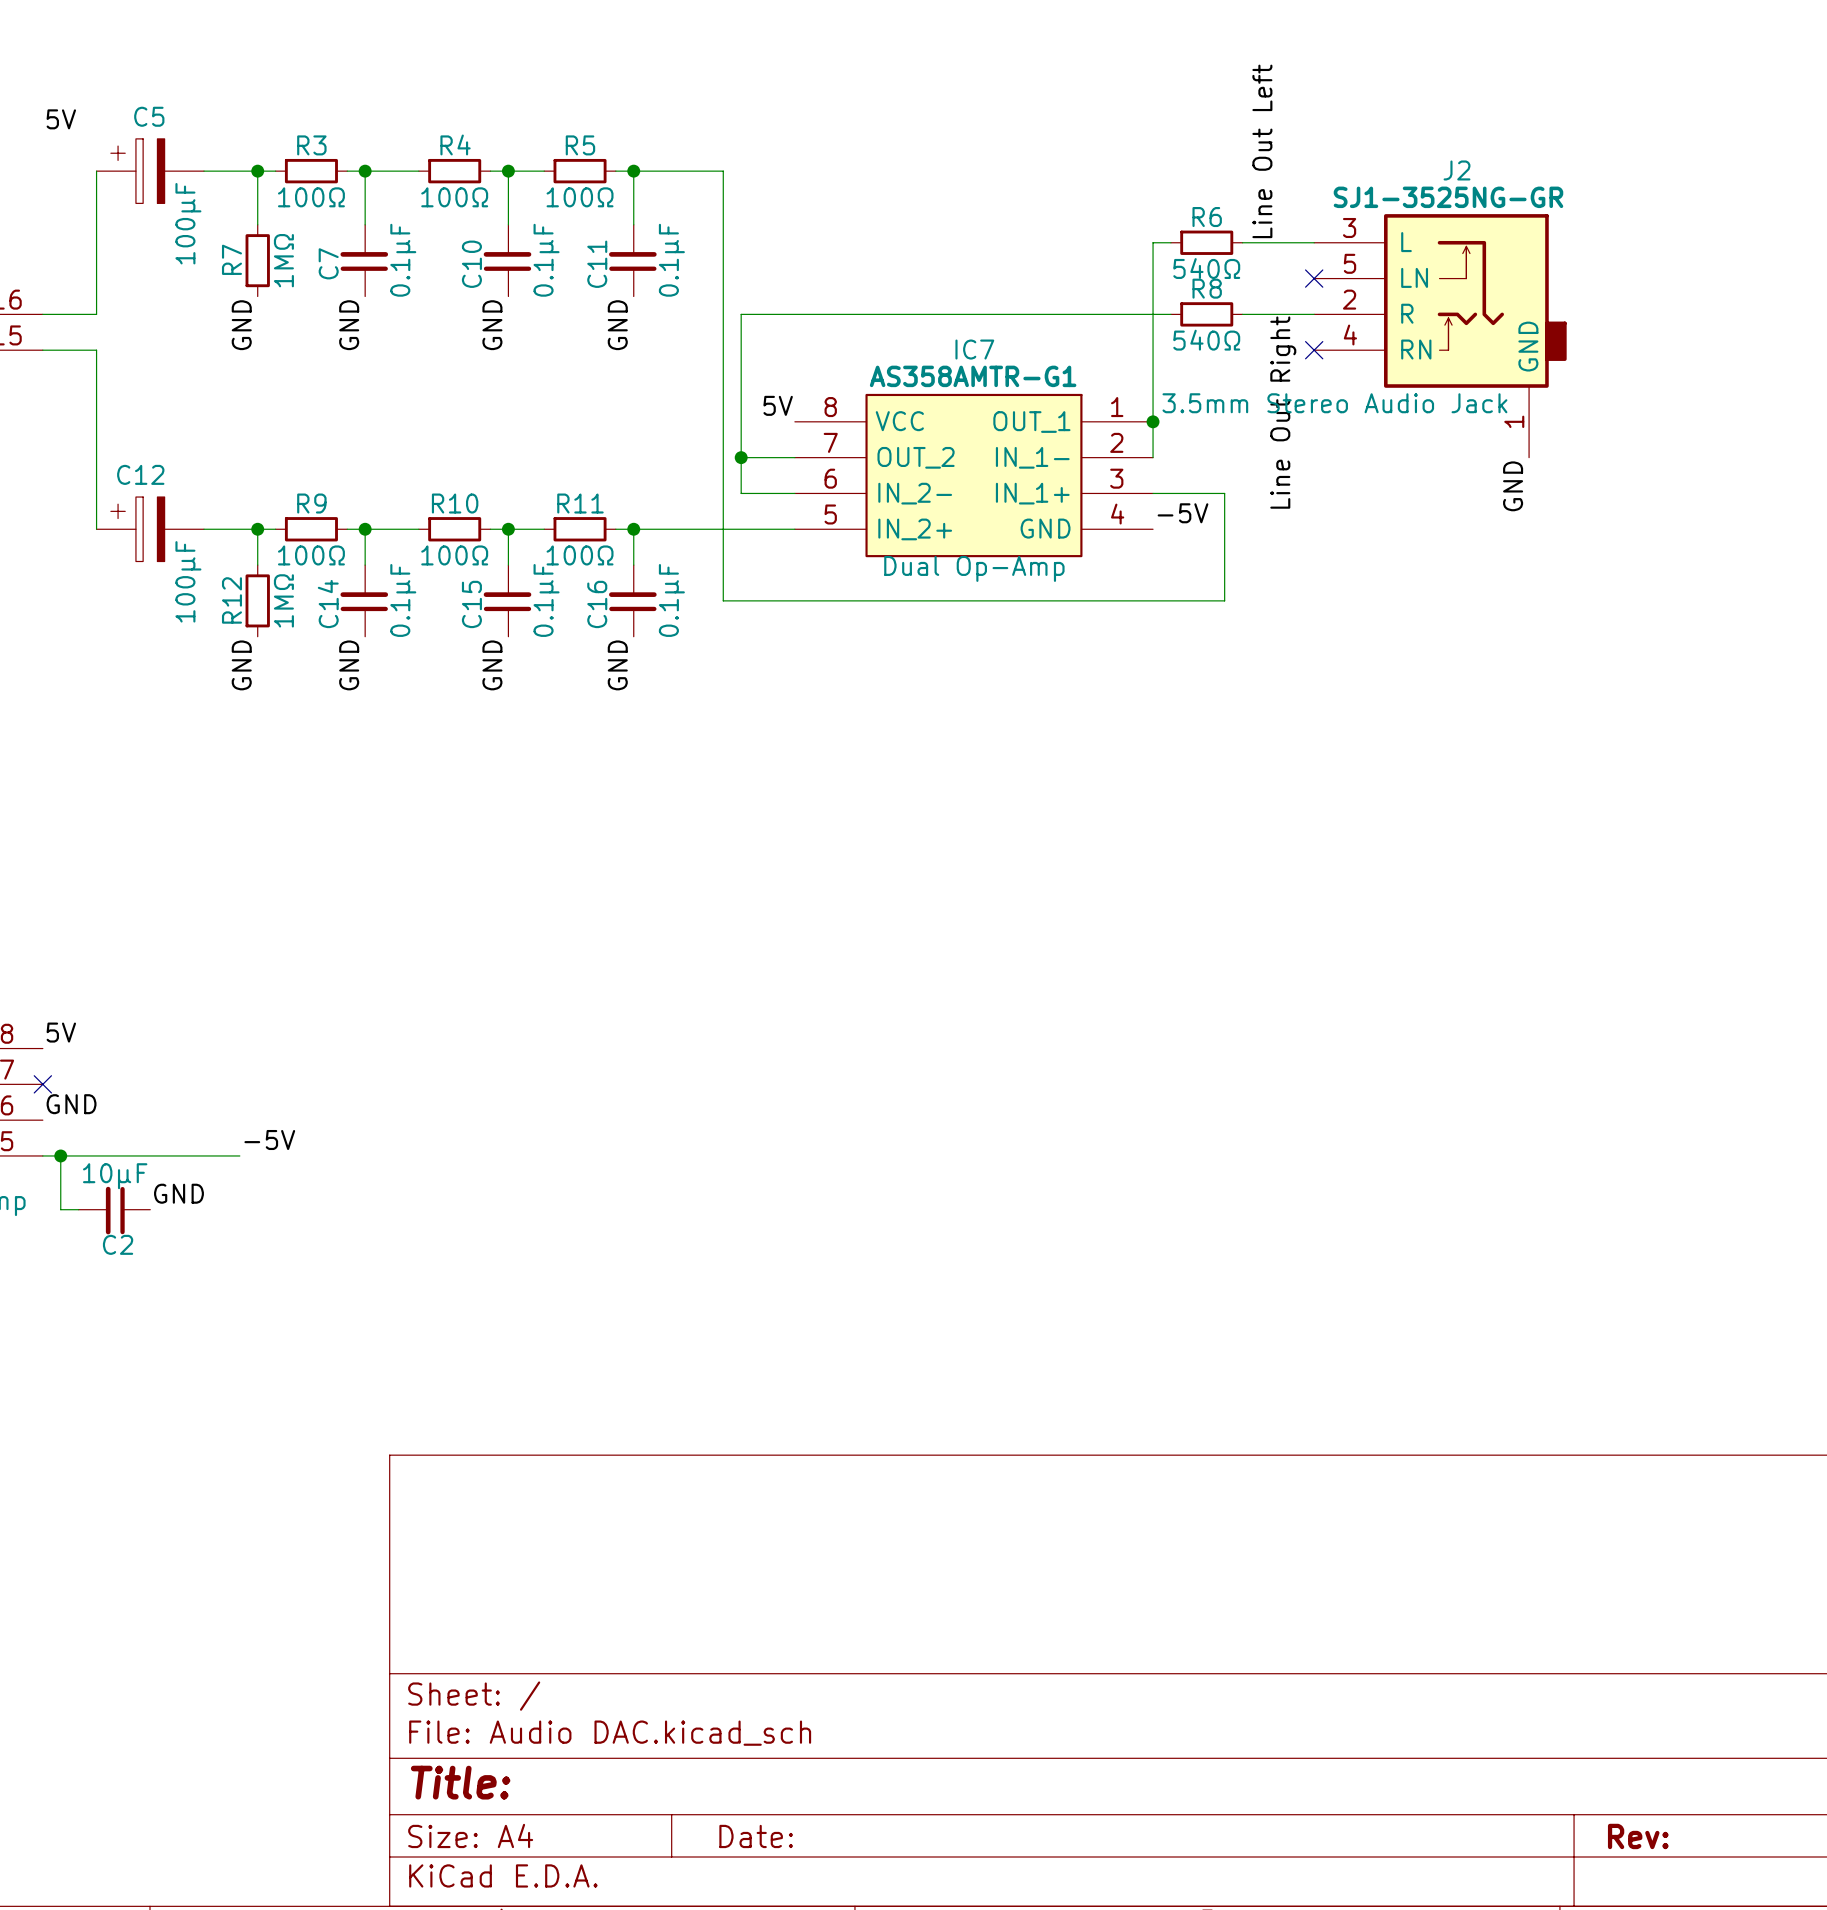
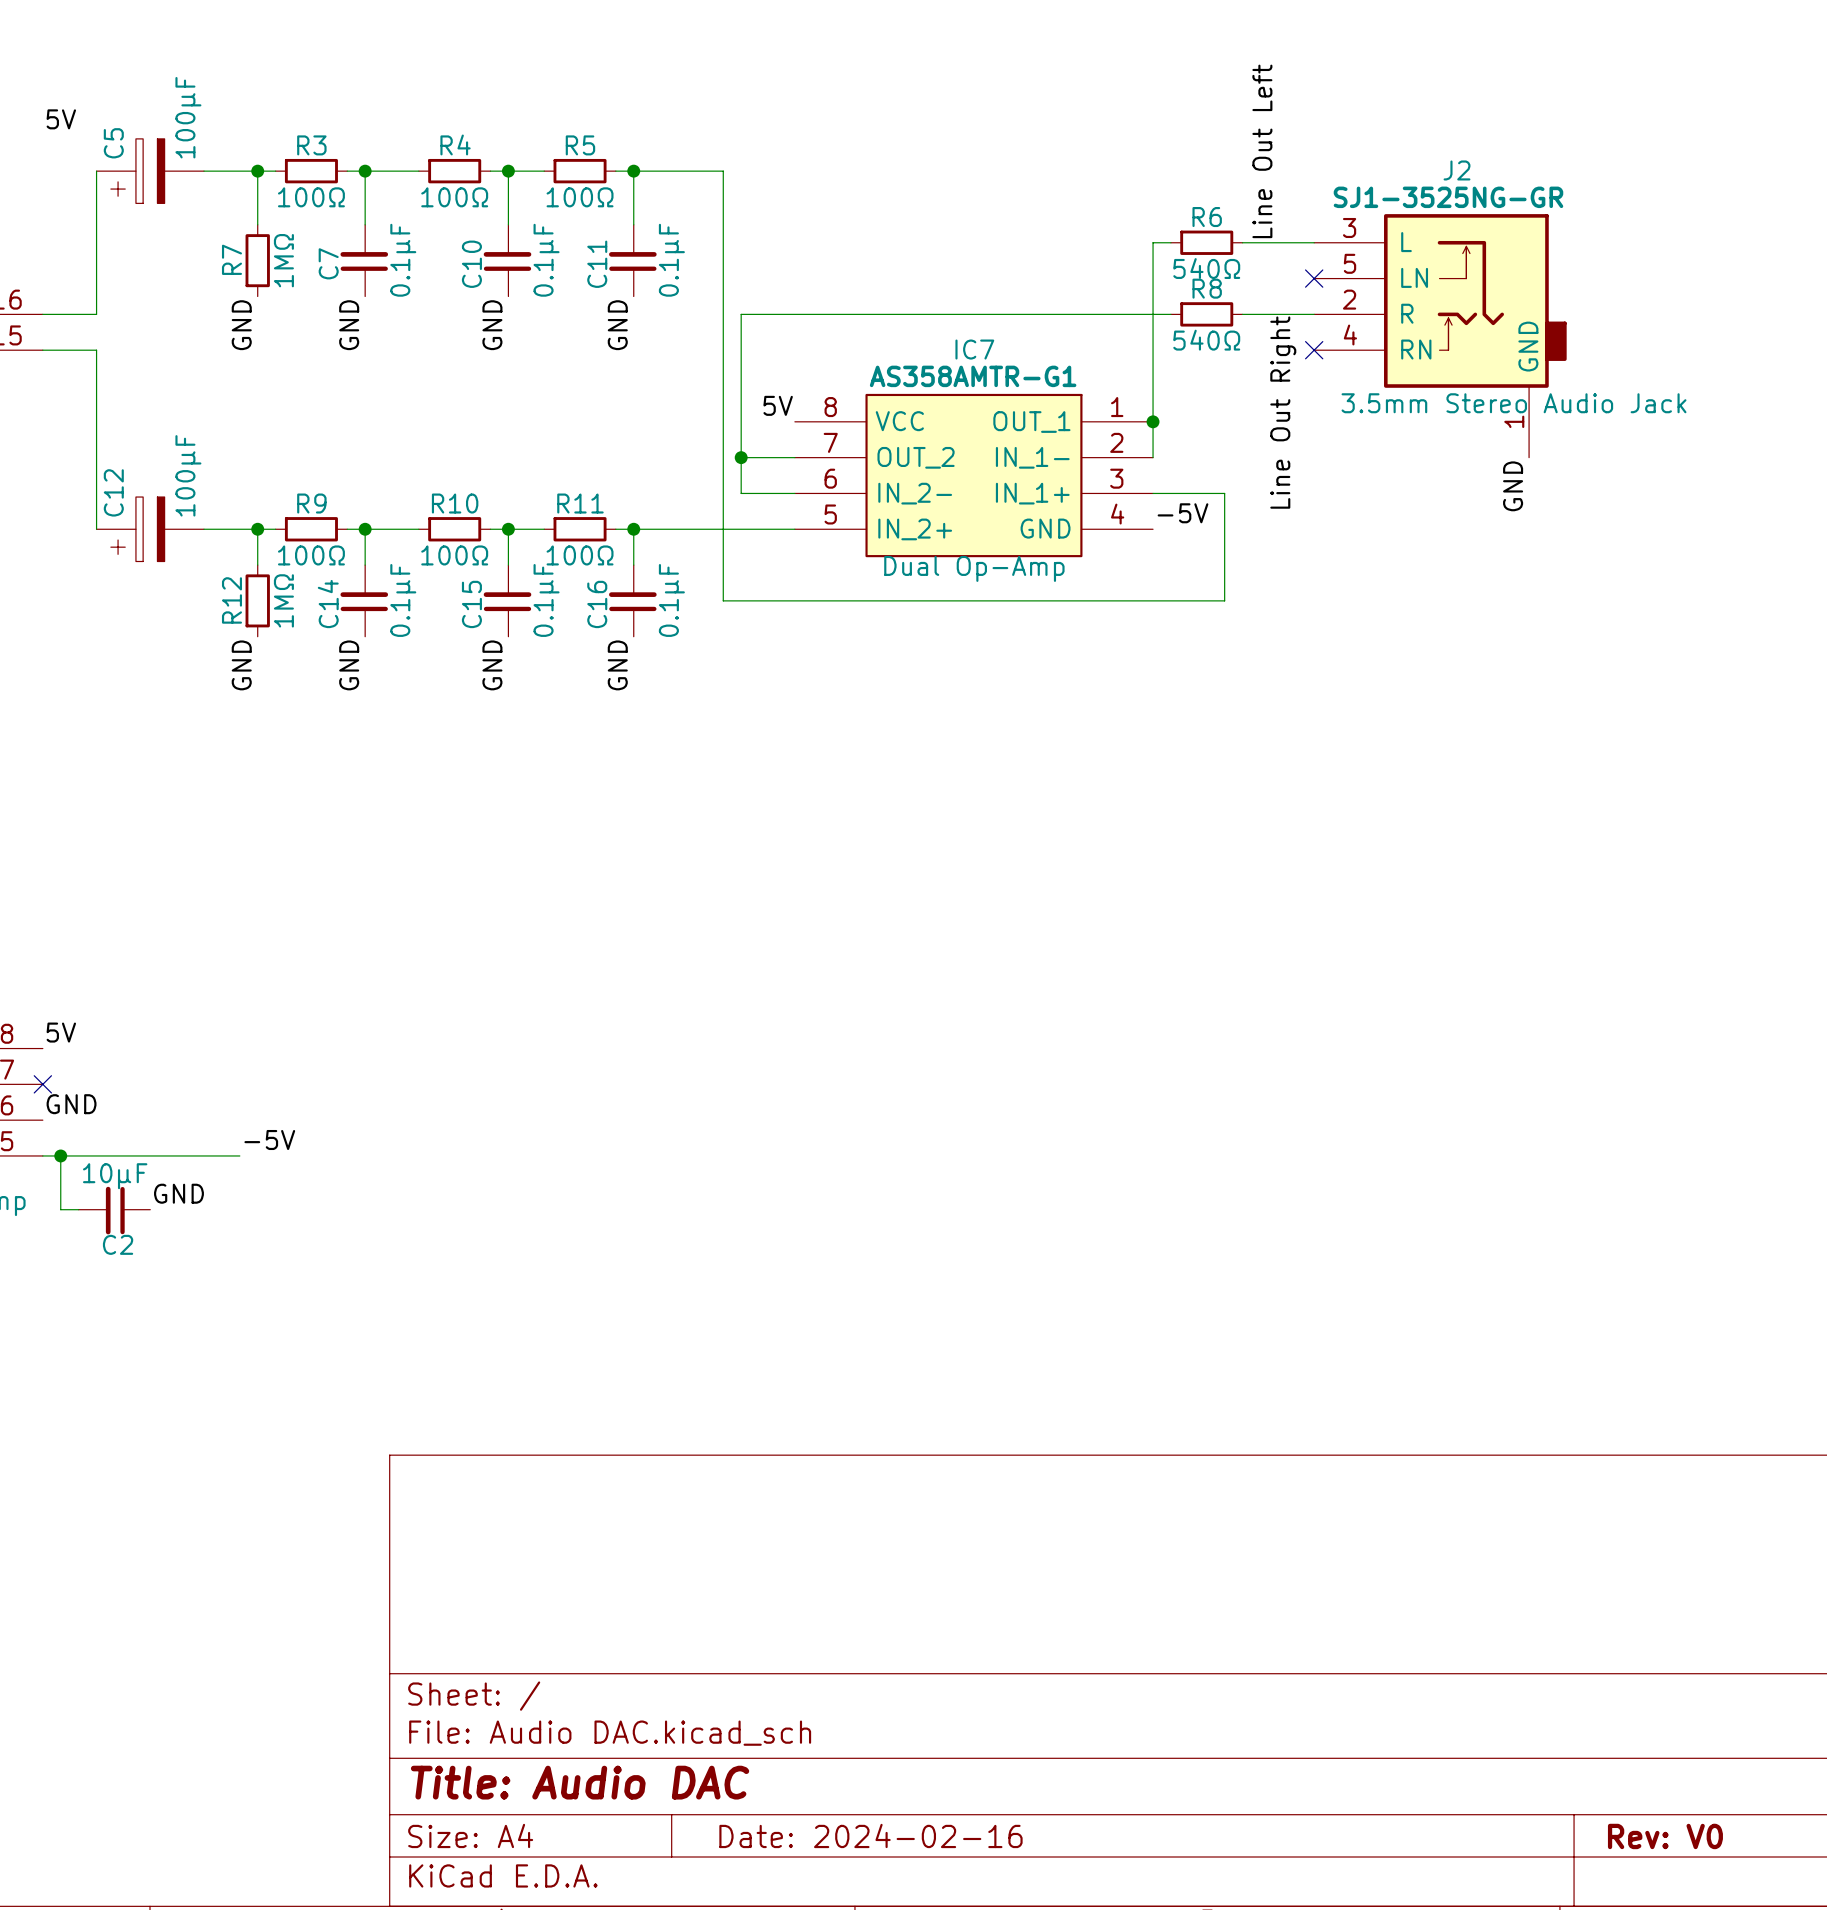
C5 name position: C5 (149, 116) -> C5 (113, 143)
C5 value: none -> 100μF (188, 117)
C5 flip: as is (137, 171) -> up-down (137, 171)
C5 text: 100μF (188, 223) -> none
J2 text position: 3.5mm Stereo Audio Jack (1334, 403) -> 3.5mm Stereo Audio Jack (1514, 403)
C12 value: none -> 100μF (188, 475)
C12 flip: as is (137, 529) -> up-down (137, 529)
C12 text: 100μF (188, 581) -> none
title block: Title: (460, 1782) -> Title: Audio DAC (580, 1782)
title block: Date: (756, 1836) -> Date: 2024-02-16 (870, 1835)
title block: Rev: (1638, 1836) -> Rev: V0 (1665, 1836)

